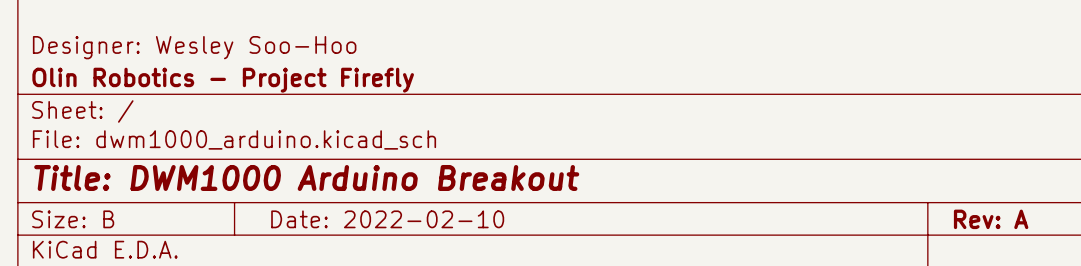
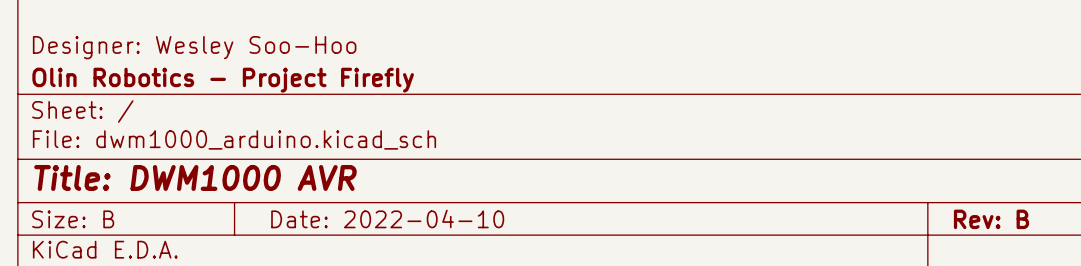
title block: Title: DWM1000 Arduino Breakout (306, 177) -> Title: DWM1000 AVR (195, 177)
title block: Date: 2022-02-10 (387, 219) -> Date: 2022-04-10 (387, 218)
title block: Rev: A (991, 219) -> Rev: B (991, 219)

